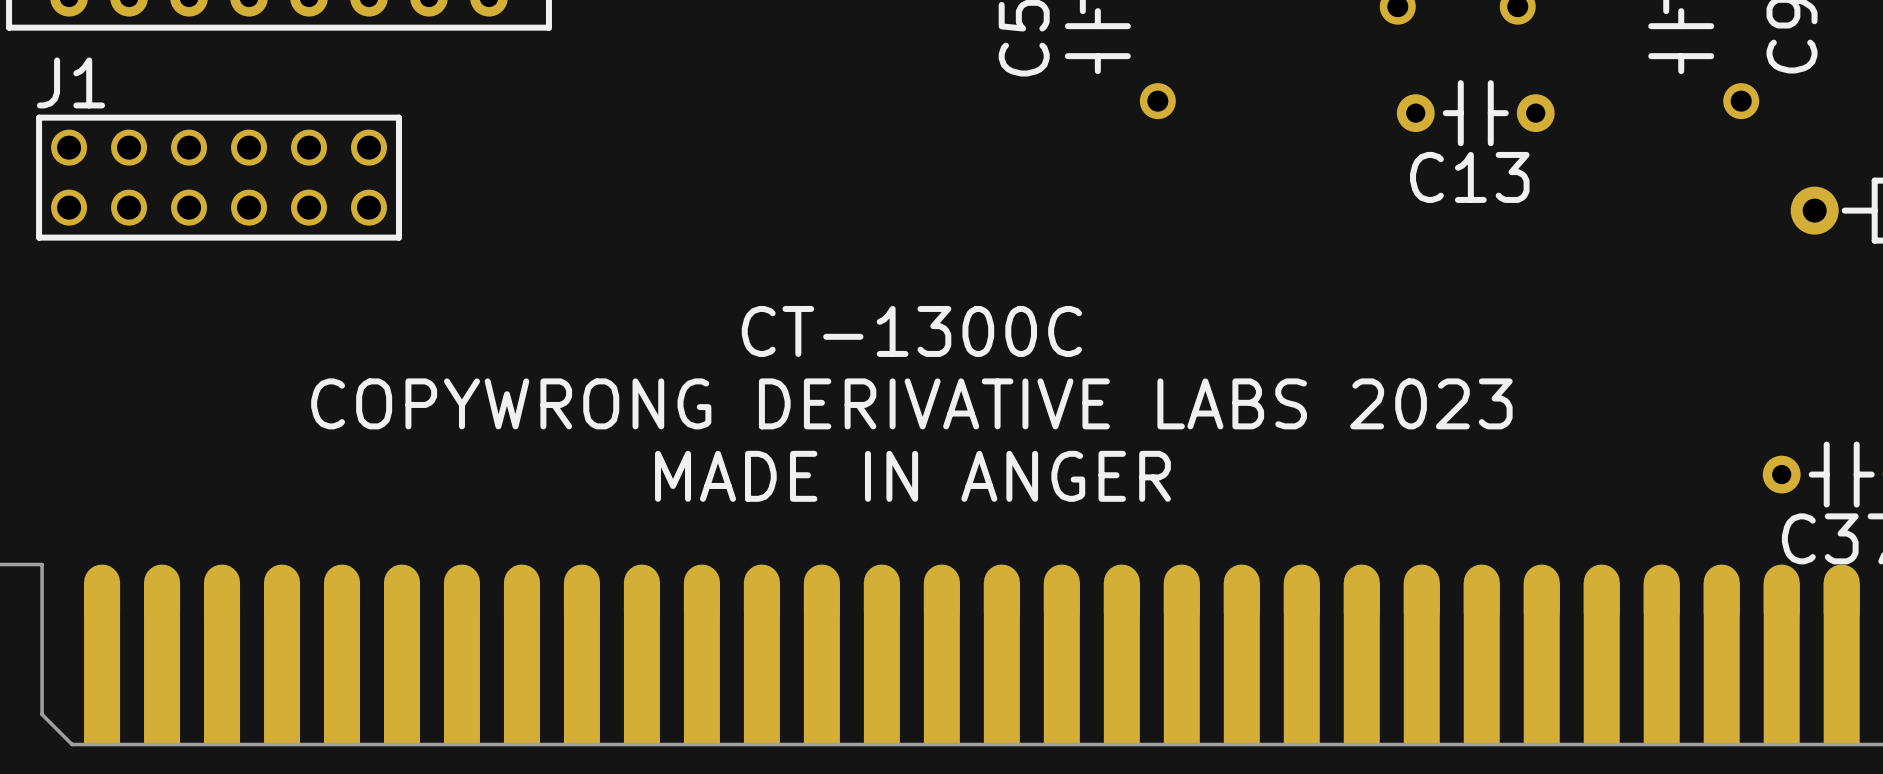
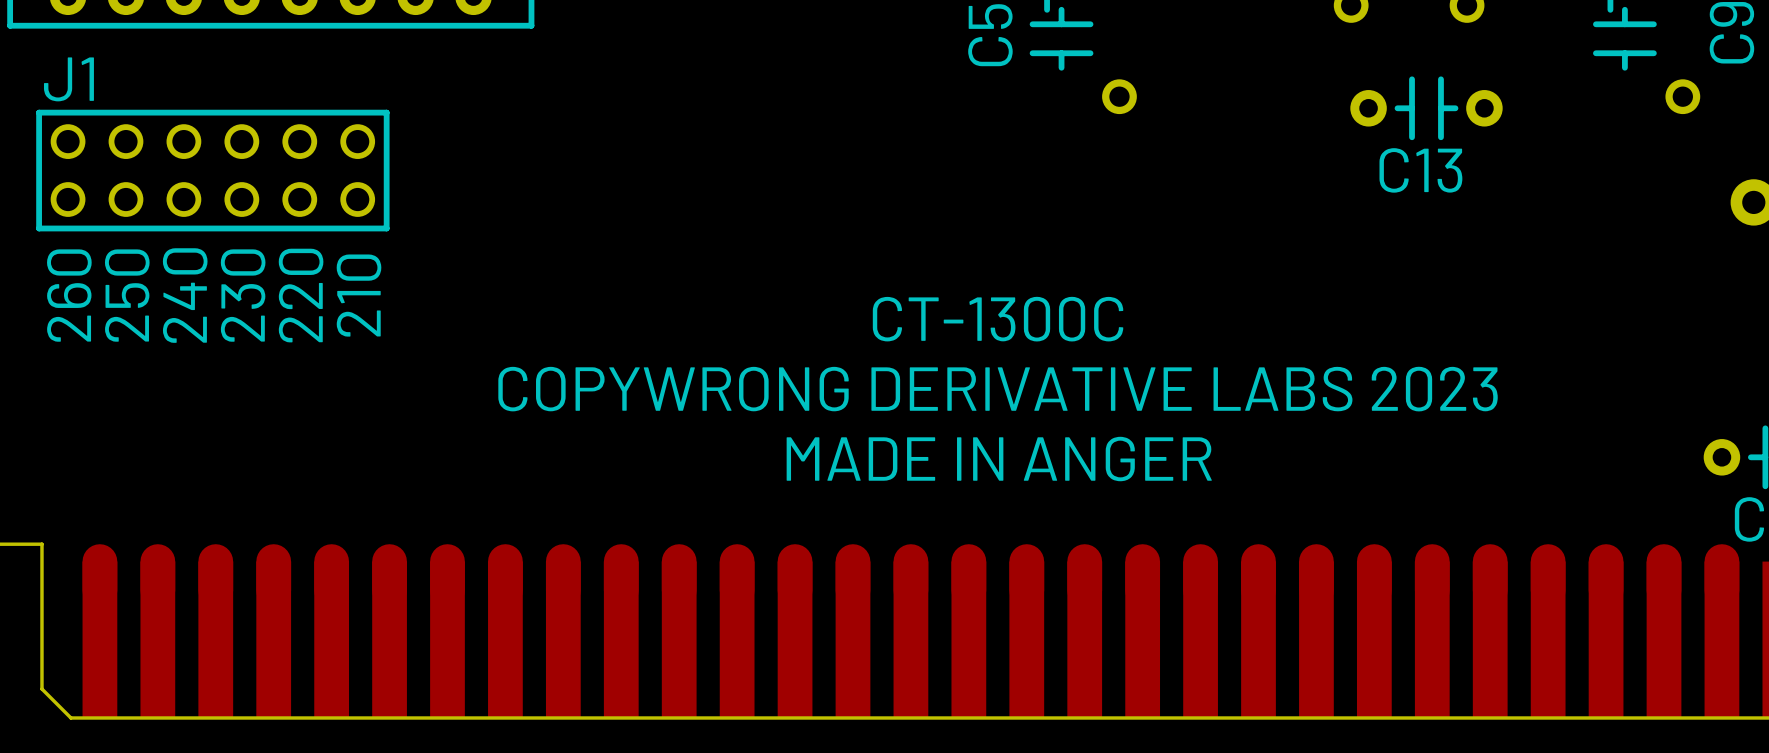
text: none -> 260 (69, 295)
text: none -> 250 (127, 295)
text: none -> 240 (185, 295)
text: none -> 230 (243, 295)
text: none -> 220 (301, 295)
text: none -> 210 (359, 295)
text position: CT-1300C (911, 331) -> CT-1300C (998, 319)
text position: COPYWRONG DERIVATIVE LABS 2023 (911, 403) -> COPYWRONG DERIVATIVE LABS 2023 (998, 389)
text position: MADE IN ANGER (912, 476) -> MADE IN ANGER (999, 459)

